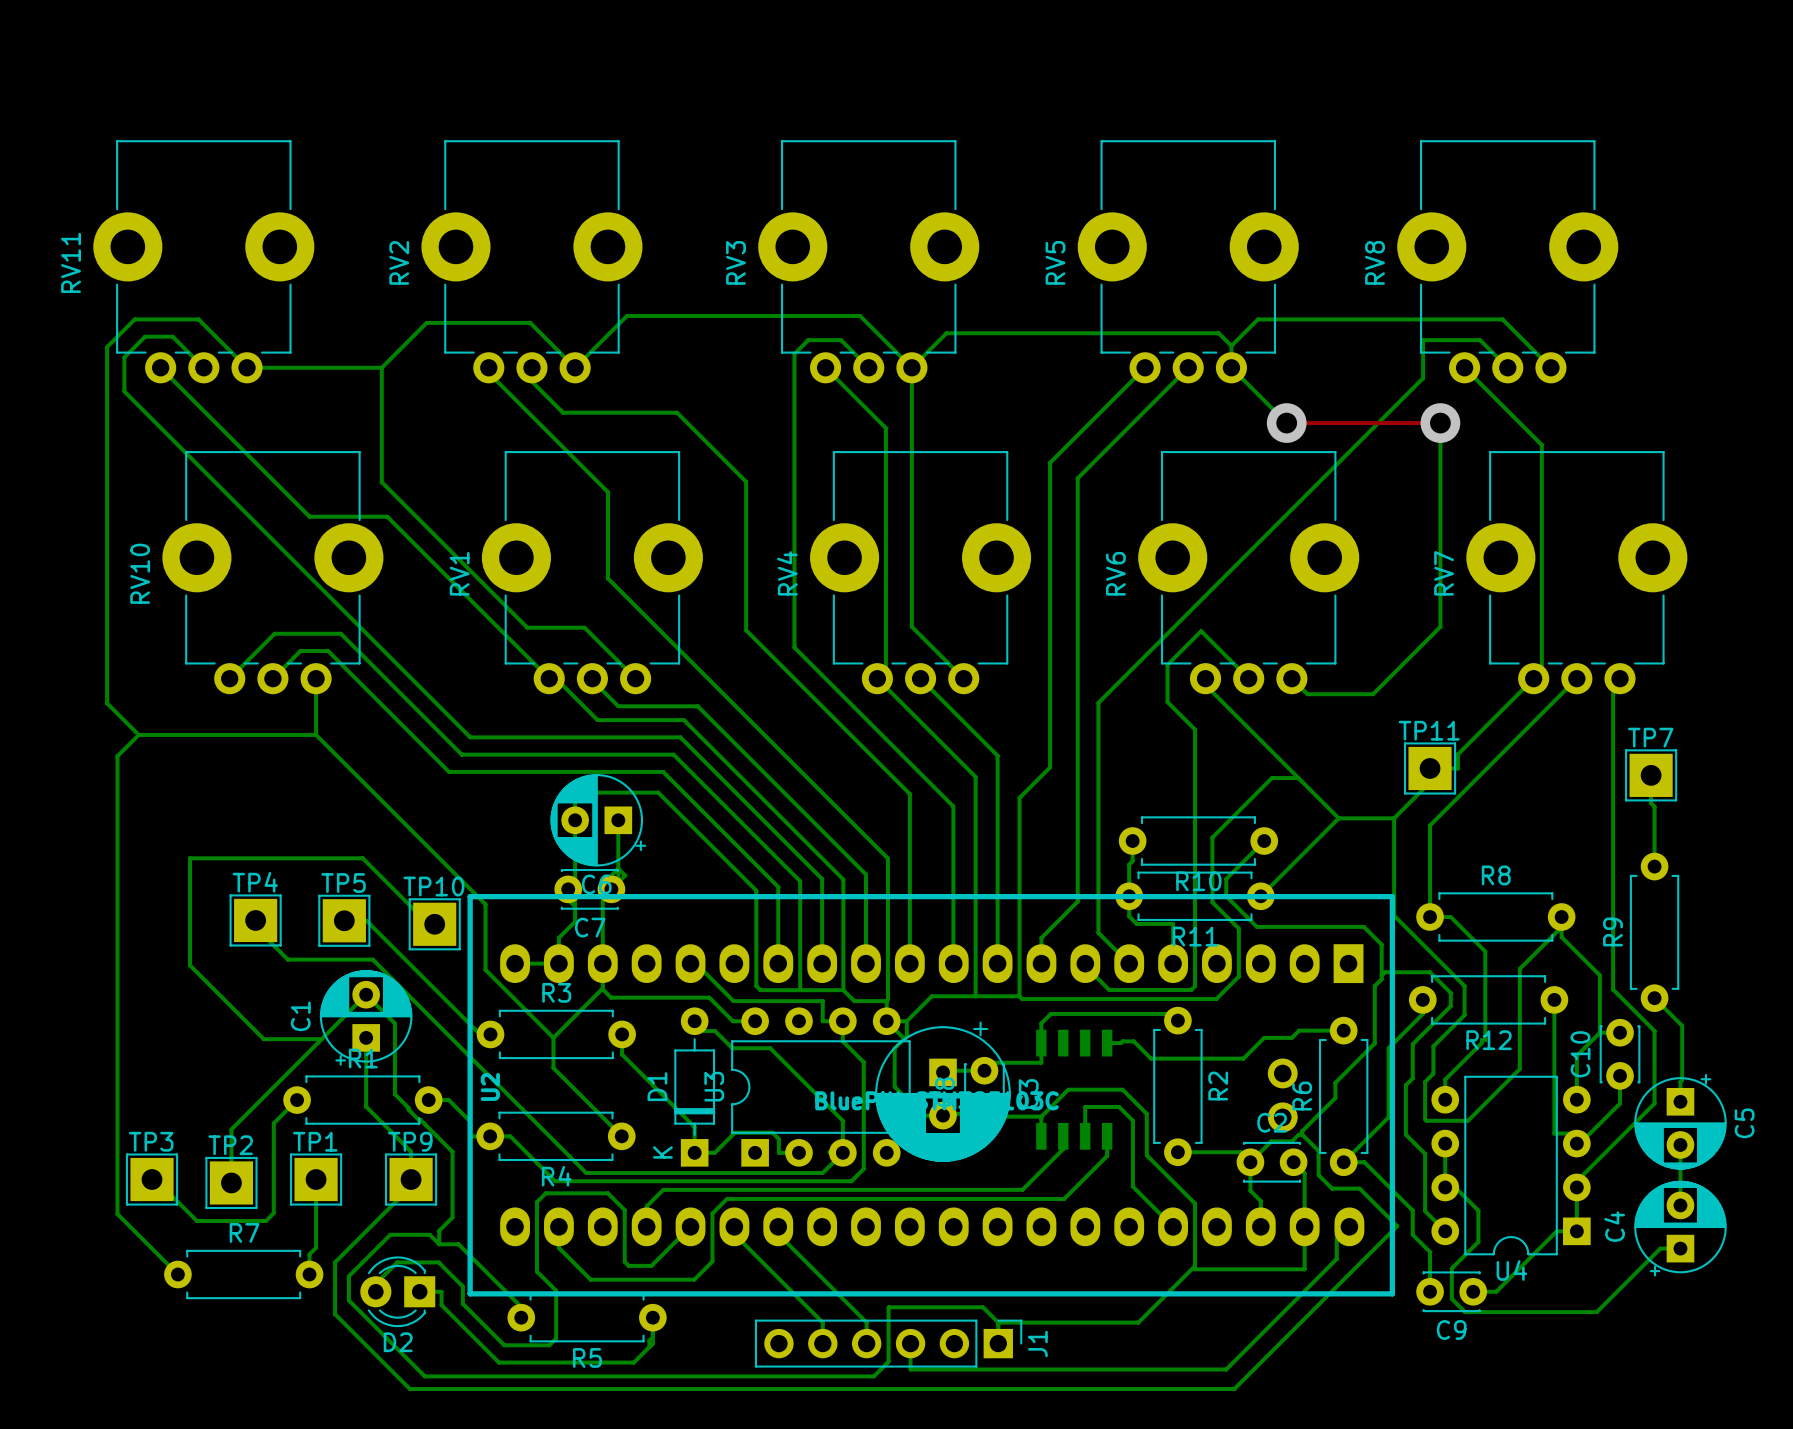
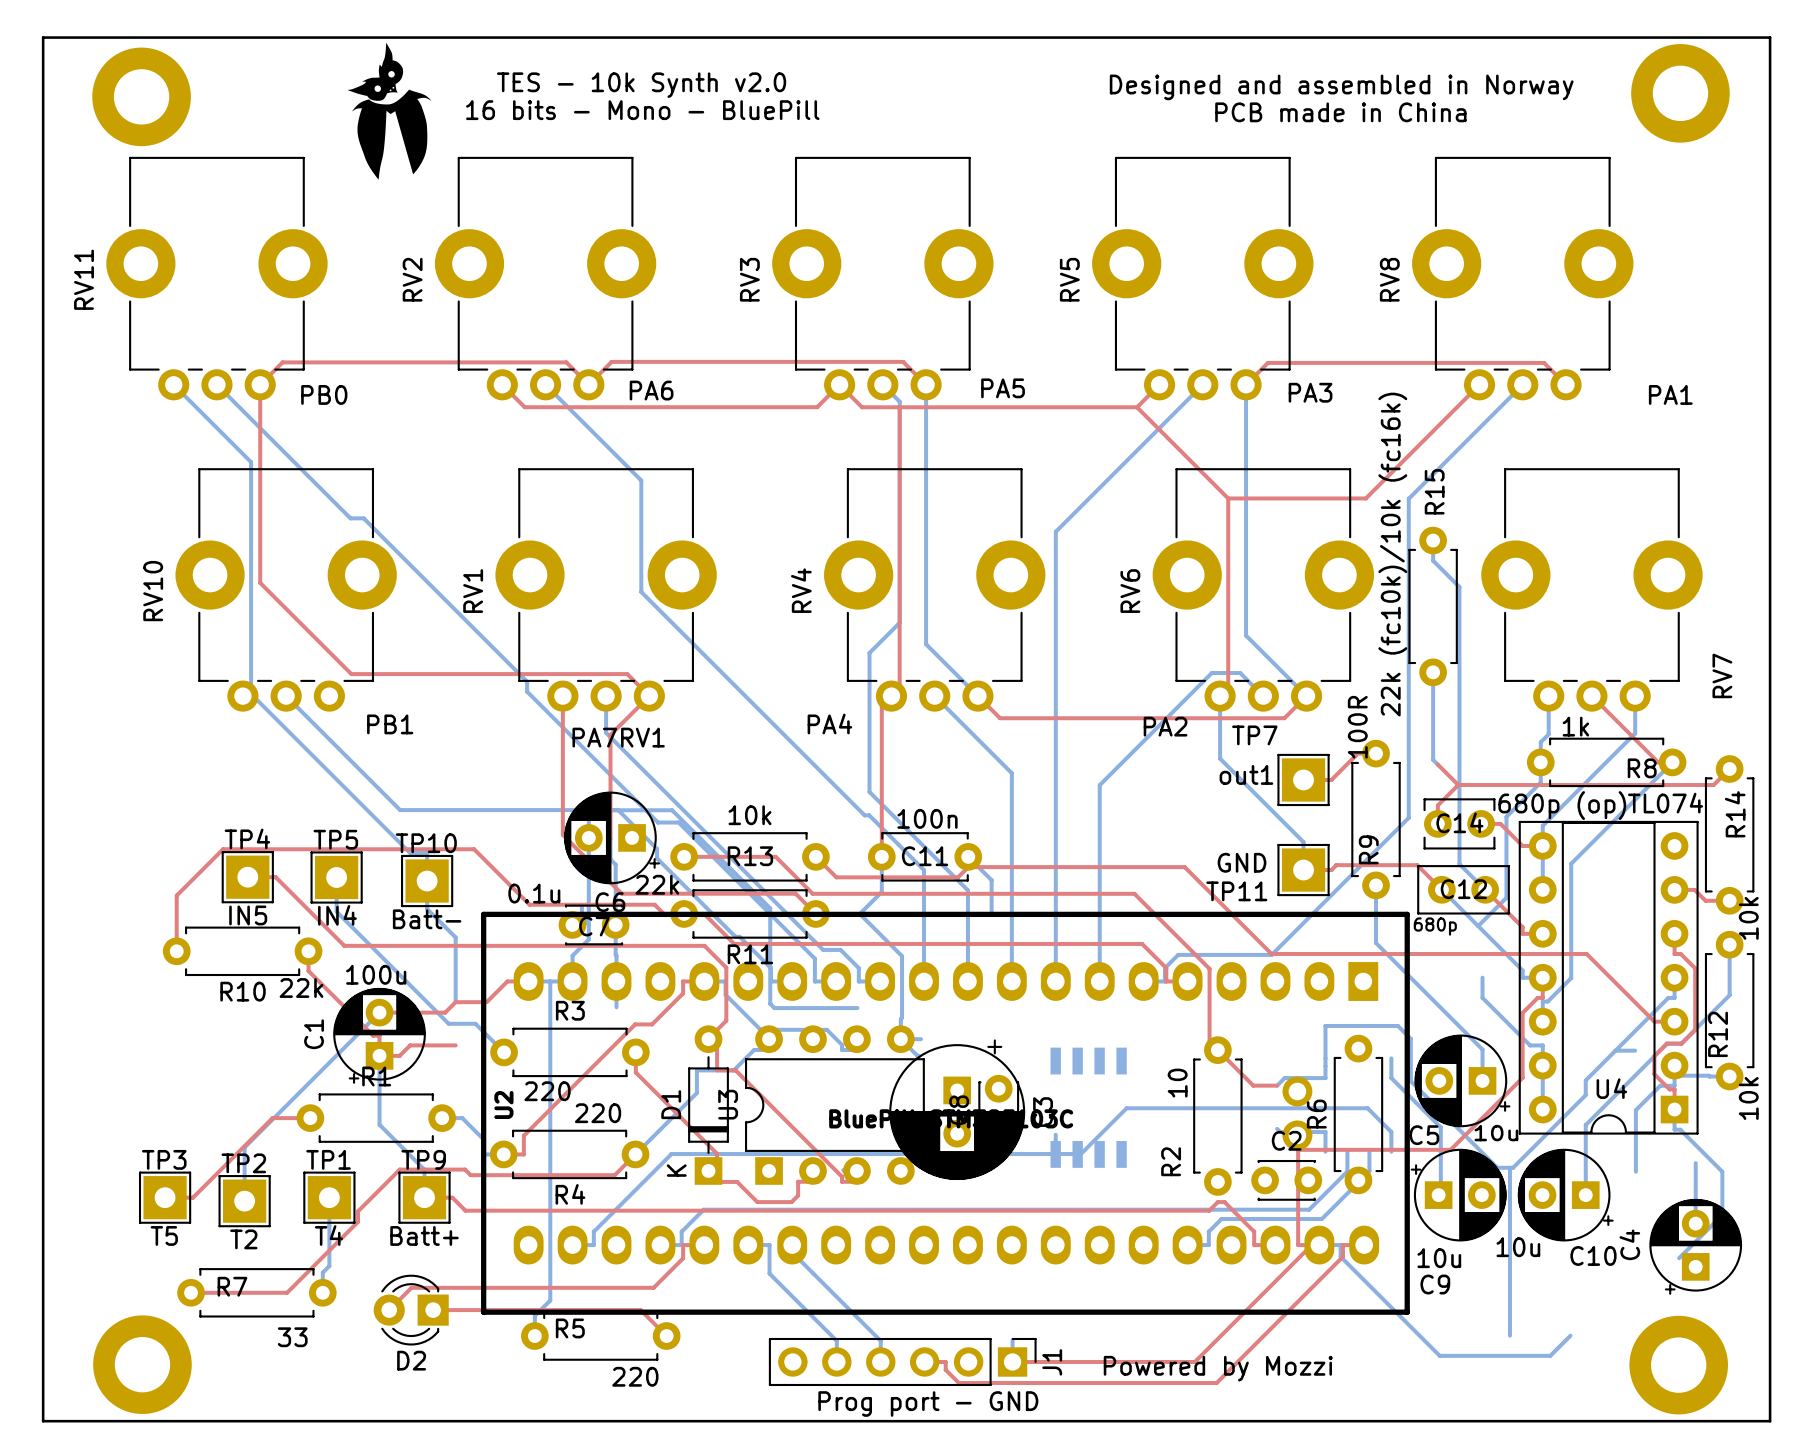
board edge: none -> (43, 37) (1770, 37) (1770, 1421) (43, 1421) (43, 37)
drawing: none -> [347, 42, 432, 180]
text: none -> TES - 10k Synth v2.0 (641, 85)
text: none -> Designed and assembled in Norway (1341, 87)
part: none -> (1680, 93)
part: none -> (141, 96)
text: none -> 16 bits - Mono - BluePill (642, 110)
text: none -> PCB made in China (1340, 112)
bottom track: (1231, 345) (1231, 367) (1286, 423) -> none
bottom track: (1231, 345) (1218, 333) (946, 333) (911, 367) (860, 315) (626, 315) (575, 367) (530, 322) (426, 322) (381, 367) -> none
bottom track: (1231, 345) (1257, 319) (1502, 319) (1550, 367) -> none
bottom track: (203, 367) (172, 336) (145, 336) (124, 357) (124, 391) (470, 737) (680, 737) (822, 879) (822, 963) -> (216, 384) (350, 518) (363, 518) (527, 681) (527, 691) (657, 822) (678, 822) (814, 958) (814, 981) (836, 981)
bottom track: (381, 367) (381, 482) (527, 627) (584, 627) (635, 678) -> none
bottom track: (381, 367) (247, 367) (198, 319) (134, 319) (107, 347) (107, 703) (138, 734) -> none
bottom track: (488, 367) (488, 372) (607, 492) (607, 578) (887, 858) (887, 938) -> (881, 856) (881, 892) (859, 913) (902, 956)
top track: none -> (502, 384) (524, 407) (817, 407) (839, 384) (862, 407) (1137, 407)
bottom track: (531, 367) (531, 381) (563, 412) (677, 412) (746, 481) (746, 630) (909, 794) (909, 852) -> (545, 384) (641, 480) (641, 591) (864, 815) (869, 815) (924, 870)
bottom track: (825, 367) (885, 428) (885, 670) (877, 678) (975, 776) (975, 996) -> none
bottom track: (868, 367) (841, 340) (808, 340) (794, 353) (794, 647) (953, 806) (953, 963) -> (882, 384) (899, 401) (899, 622) (869, 652) (869, 791) (967, 890) (967, 981)
top track: none -> (926, 384) (903, 361) (611, 361) (588, 384) (566, 362) (282, 362) (260, 384) (260, 582) (351, 674) (627, 674) (649, 696) (610, 734) (610, 839)
bottom track: (1145, 367) (1050, 462) (1050, 767) (1019, 797) (1019, 996) -> none
top track: none -> (1159, 384) (1137, 407)
top track: none -> (1246, 384) (1267, 362) (1544, 362) (1566, 384)
bottom track: (1464, 367) (1541, 445) (1541, 670) (1457, 754) (1457, 768) (1430, 768) -> none
top track: none -> (1479, 384) (1365, 498) (1228, 498)
bottom track: (1507, 367) (1480, 340) (1423, 340) (1423, 378) (1098, 702) (1098, 932) (1129, 963) -> (1522, 384) (1408, 498) (1408, 817) (1271, 954) (1178, 954) (1164, 968) (1164, 981) (1143, 981)
RV3 text: none -> PA5 (1003, 388)
RV2 text: none -> PA6 (651, 390)
RV5 text: none -> PA3 (1310, 392)
RV11 text: none -> PB0 (324, 394)
RV7 text: none -> PA1 (1670, 394)
top track: none -> (899, 407) (899, 687) (881, 705) (881, 856)
top track: none -> (1137, 407) (1228, 498)
top track: (1286, 423) (1440, 423) -> none
via: (1286, 423) -> none
bottom track: (1440, 423) (1440, 626) (1373, 694) (1307, 694) (1291, 678) -> (1246, 384) (1246, 635) (1306, 696)
via: (1440, 423) -> none
bottom track: (237, 445) (309, 516) (387, 516) (549, 678) (556, 678) (597, 720) (683, 720) (843, 879) (843, 990) (854, 1001) (886, 1001) -> (251, 462) (251, 691) (246, 696) (242, 696)
bottom track: (1077, 478) (1077, 901) (1041, 937) -> (1092, 495) (1055, 531) (1055, 955)
top track: none -> (1228, 498) (1228, 687) (1220, 696)
bottom track: none -> (1433, 540) (1433, 560) (1459, 587) (1459, 864) (1485, 889)
RV7 name position: RV7 (1444, 573) -> RV7 (1722, 675)
R15: none -> 22k (fc10k)/10k (fc16k) (1433, 606)
bottom track: none -> (1433, 672) (1433, 759) (1437, 764)
bottom track: (1225, 655) (1201, 631) (1167, 664) (1167, 702) (1195, 729) (1195, 986) (1191, 990) (1109, 990) (1085, 966) (1085, 963) -> (1240, 673) (1211, 673) (1099, 785) (1099, 981)
bottom track: none -> (250, 692) (410, 853) (427, 853) (427, 908) (455, 937) (455, 1002)
bottom track: (229, 678) (274, 633) (340, 633) (461, 754) (673, 754) (800, 881) (800, 990) -> none
bottom track: (272, 678) (300, 651) (328, 651) (449, 771) (663, 771) (778, 886) (778, 963) -> (286, 696) (400, 810) (618, 810) (657, 848) (657, 858) (735, 936) (739, 936) (770, 968) (770, 981) (792, 981)
bottom track: (316, 678) (316, 734) -> none
top track: none -> (562, 696) (562, 834) (621, 893) (795, 893) (815, 913) (859, 913)
top track: none -> (977, 696) (1000, 718) (1284, 718) (1306, 696)
bottom track: none -> (1548, 696) (1548, 734) (1540, 742) (1540, 782) (1506, 816) (1506, 897) (1478, 926)
bottom track: (1576, 678) (1430, 825) (1430, 917) (1450, 917) (1485, 951) (1485, 1039) (1481, 1039) (1481, 1042) (1445, 1079) (1445, 1099) -> none
top track: none -> (1591, 696) (1658, 762) (1672, 762)
bottom track: (1620, 678) (1613, 685) (1613, 989) (1654, 1030) (1654, 1103) (1576, 1181) (1576, 1231) (1556, 1231) (1496, 1291) (1473, 1291) -> (1635, 696) (1635, 733) (1542, 825) (1542, 889)
bottom track: (592, 680) (618, 706) (697, 706) (866, 874) (866, 963) -> (606, 697) (606, 732) (823, 949) (840, 949) (858, 968) (858, 981) (880, 981)
bottom track: (1205, 685) (1338, 818) -> (1220, 702) (1220, 758) (1303, 842) (1303, 870)
RV10 text: none -> PB1 (390, 724)
RV4 text: none -> PA4 (829, 724)
RV6 text: none -> PA2 (1165, 726)
R9 value: none -> 100R (1357, 727)
R8 value: none -> 1k (1575, 726)
RV1 text: none -> PA7RV1 (618, 737)
TP11 name position: TP11 (1429, 730) -> TP11 (1236, 891)
bottom track: (138, 734) (316, 734) -> none
bottom track: (138, 734) (117, 756) (117, 1214) (177, 1274) -> none
bottom track: (316, 734) (485, 904) (485, 969) (553, 1037) -> none
top track: none -> (1376, 753) (1355, 753) (1331, 779) (1303, 779)
TP7 name position: TP7 (1650, 737) -> TP7 (1254, 735)
bottom track: none -> (1672, 762) (1571, 863) (1571, 978) (1547, 1001) (1542, 1001) (1542, 1021)
top track: none -> (1437, 764) (1458, 785)
top track: none -> (1729, 768) (1713, 785) (1458, 785)
TP7 value: none -> out1 (1246, 774)
top track: none -> (1458, 785) (1437, 805) (1437, 823)
TP11 position: (1430, 768) -> (1303, 870)
bottom track: (1444, 768) (1394, 818) -> none
bottom track: (1651, 775) (1651, 803) (1654, 806) (1654, 866) -> none
TP7 position: (1651, 775) -> (1303, 779)
bottom track: (1298, 778) (1271, 778) (1212, 837) (1212, 902) (1238, 928) (1238, 976) (1216, 999) (1022, 999) (1019, 996) -> none
U4 value: none -> TL074 (1665, 803)
C14: none -> 680p (op) (1459, 823)
top track: none -> (1481, 823) (1500, 823) (1522, 845) (1542, 845)
R14: none -> 10k (1729, 834)
bottom track: (1338, 818) (1260, 896) -> none
bottom track: (1338, 818) (1394, 818) -> none
bottom track: (1394, 818) (1394, 915) (1464, 986) (1464, 1015) (1433, 1046) (1433, 1073) (1425, 1081) (1426, 1120) (1468, 1120) (1519, 1068) (1519, 968) (1561, 927) -> none
bottom track: (618, 820) (618, 882) -> none
top track: none -> (684, 856) (775, 856) (812, 893) (1134, 893) (1209, 968) (1209, 1041) (1253, 1085) (1277, 1085)
R13: none -> 10k (750, 856)
top track: none -> (815, 856) (836, 877) (958, 877) (968, 867)
C11: none -> 100n (925, 856)
bottom track: none -> (968, 856) (991, 880) (991, 913)
bottom track: (1132, 841) (1132, 861) (1129, 864) (1129, 916) (1136, 923) (1173, 923) (1173, 963) -> none
R10 position: (1198, 841) -> (242, 951)
bottom track: (1264, 841) (1226, 879) (1226, 896) (1256, 926) (1363, 926) (1381, 944) (1381, 979) (1374, 986) (1374, 1043) (1335, 1082) (1335, 1098) (1302, 1131) (1302, 1134) -> none
TP11 value: none -> GND (1242, 862)
top track: none -> (968, 867) (1184, 867) (1271, 953) (1586, 953) (1654, 1021) (1674, 1021)
top track: none -> (1303, 870) (1331, 870) (1336, 865) (1417, 865) (1441, 889)
top track: none -> (247, 877) (275, 877) (344, 945) (704, 945) (726, 967) (726, 1020) (717, 1029) (717, 1070) (735, 1070) (842, 1176) (842, 1181) (862, 1181)
R11 value: none -> 22k (657, 884)
bottom track: none -> (1376, 885) (1376, 943) (1482, 1049) (1482, 1080)
bottom track: none -> (1441, 889) (1478, 926)
C12: none -> 680p (1463, 889)
top track: none -> (1485, 889) (1522, 927) (1522, 933) (1542, 933)
top track: none -> (1674, 889) (1694, 889) (1705, 900) (1729, 900)
C7 value: none -> 0.1u (534, 893)
R8 name position: R8 (1496, 875) -> R8 (1642, 768)
C7 position: (589, 889) -> (594, 924)
bottom track: (611, 889) (625, 875) (618, 868) (602, 884) (602, 937) -> (610, 839) (610, 859) (615, 864) (616, 955)
R11 position: (1194, 896) -> (750, 913)
TP4 value: none -> IN5 (248, 915)
TP5 value: none -> IN4 (337, 915)
TP10 value: none -> Batt- (427, 919)
bottom track: none -> (1478, 926) (1522, 970) (1522, 977) (1542, 977)
top track: none -> (1674, 933) (1674, 953) (1680, 953) (1695, 968) (1695, 1030) (1681, 1043) (1666, 1043) (1654, 1056) (1654, 1074) (1669, 1089) (1674, 1089) (1674, 1109)
R8 position: (1495, 917) -> (1606, 762)
bottom track: (1561, 917) (1561, 937) (1599, 975) (1599, 1032) (1576, 1055) (1576, 1099) -> none
bottom track: (255, 920) (255, 927) (287, 959) (372, 959) (586, 1172) (822, 1172) (842, 1152) (842, 1120) (770, 1048) (732, 1048) (715, 1030) (704, 1030) (694, 1021) -> none
TP4 position: (255, 920) -> (247, 877)
bottom track: (344, 920) (366, 920) (480, 1034) (490, 1034) -> (336, 877) (336, 911) (448, 1023) (475, 1023) (504, 1052)
TP5 position: (344, 920) -> (336, 877)
bottom track: (434, 924) (428, 924) (362, 858) (190, 858) (190, 965) (263, 1039) (321, 1039) -> none
TP10 position: (434, 924) -> (427, 881)
bottom track: none -> (1729, 944) (1729, 995) (1681, 1043) (1667, 1043) (1585, 1125) (1585, 1195)
C7 name position: C7 (590, 927) -> C7 (594, 926)
R9 name position: R9 (1612, 931) -> R9 (1368, 849)
R9 position: (1654, 932) -> (1376, 819)
top track: none -> (176, 951) (176, 895) (223, 849) (474, 849) (529, 904) (654, 904) (663, 913) (704, 913) (734, 943) (1142, 943) (1166, 968) (1166, 981) (1187, 981)
top track: none -> (308, 951) (308, 970) (373, 1035) (379, 1035) (379, 1055) (399, 1055) (410, 1045) (455, 1045)
C1 value: none -> 100u (376, 974)
bottom track: none -> (1482, 977) (1482, 997) (1530, 1045) (1542, 1045) (1542, 1109)
top track: none -> (1542, 977) (1542, 997) (1537, 997) (1522, 1013) (1522, 1077) (1450, 1149) (1298, 1149) (1298, 1245) (1319, 1245)
bottom track: none -> (1674, 977) (1674, 997) (1668, 997) (1585, 1080) (1585, 1095) (1513, 1167) (1497, 1167) (1410, 1081) (1410, 1038) (1397, 1025) (1325, 1025) (1325, 1078) (1284, 1078) (1277, 1085)
top track: none -> (528, 981) (507, 981) (486, 1002) (455, 1002) (445, 1012) (379, 1012)
top track: none -> (704, 981) (683, 981) (683, 993) (652, 1024) (635, 1024) (523, 1135) (523, 1154) (503, 1154)
bottom track: (696, 963) (733, 1001) (822, 1001) (822, 1021) (842, 1021) (842, 1041) (863, 1062) (863, 1168) (851, 1181) (555, 1181) (510, 1136) (490, 1136) -> (709, 981) (725, 981) (725, 994) (760, 1029) (826, 1029) (842, 1044) (842, 1049) (862, 1049)
R10 value: none -> 22k (301, 988)
bottom track: (1381, 975) (1385, 972) (1430, 972) (1450, 992) (1450, 1006) (1412, 1044) (1412, 1078) (1405, 1085) (1405, 1134) (1425, 1153) (1425, 1211) (1445, 1231) -> none
bottom track: (366, 994) (394, 1023) (394, 1094) (452, 1151) (452, 1217) (439, 1230) (439, 1244) -> none
bottom track: (1019, 996) (931, 996) (906, 1021) (906, 1036) (894, 1048) (894, 1086) (923, 1115) (984, 1113) (987, 1116) (1041, 1116) (1068, 1089) (1122, 1089) (1146, 1113) (1146, 1155) (1195, 1203) (1195, 1269) (1304, 1269) (1304, 1173) (1293, 1162) -> none
bottom track: (1654, 998) (1682, 1025) (1680, 1101) -> none
bottom track: (1422, 999) (1422, 1014) (1388, 1048) (1388, 1117) (1343, 1162) (1364, 1162) (1412, 1210) (1412, 1234) (1430, 1252) (1430, 1291) -> none
R12 rotation: 0° (1488, 999) -> 90° clockwise (1729, 1010)
R12 position: (1488, 999) -> (1729, 1010)
bottom track: (1554, 999) (1554, 1133) (1576, 1133) (1576, 1143) (1579, 1143) (1620, 1103) (1620, 1075) -> none
C10 footprint: [1599, 1018, 1641, 1090] -> [1517, 1148, 1614, 1242]
bottom track: (1177, 1020) (1171, 1013) (1050, 1013) (1041, 1023) (1041, 1062) (992, 1062) (984, 1070) (944, 1070) (943, 1072) -> none
bottom track: (755, 1021) (732, 1021) (709, 997) (611, 997) (601, 989) (553, 1037) -> none
bottom track: (1343, 1030) (1299, 1030) (1291, 1037) (1264, 1037) (1243, 1058) (1151, 1058) (1133, 1041) (1107, 1043) -> none
bottom track: (622, 1034) (622, 1054) (694, 1127) (694, 1152) (714, 1152) (734, 1132) (772, 1132) (778, 1139) (778, 1152) (798, 1152) -> none
top track: none -> (635, 1052) (635, 1072) (717, 1153) (717, 1181) (737, 1181) (757, 1202) (791, 1202) (798, 1195) (798, 1181) (818, 1181)
bottom track: (553, 1037) (553, 1068) (621, 1136) -> (774, 1049) (754, 1049) (733, 1070) (696, 1070) (696, 1093) (635, 1154)
bottom track: none -> (1391, 1058) (1391, 1078) (1440, 1127) (1440, 1186)
bottom track: none -> (1674, 1065) (1674, 1085) (1660, 1085) (1635, 1110) (1635, 1171)
C10 name position: C10 (1580, 1054) -> C10 (1593, 1255)
bottom track: none -> (1674, 1075) (1729, 1076)
R2 value: none -> 10 (1177, 1083)
R3 value: none -> 220 (547, 1091)
U4 footprint: [1431, 1075, 1591, 1256] -> [1518, 820, 1699, 1135]
R12 value: none -> 10k (1748, 1098)
R2 position: (1177, 1086) -> (1217, 1116)
R2 name position: R2 (1218, 1086) -> R2 (1171, 1161)
bottom track: none -> (1674, 1109) (1674, 1129) (1680, 1129) (1722, 1171) (1722, 1214) (1679, 1258)
R4 value: none -> 220 (598, 1113)
bottom track: (297, 1100) (273, 1123) (273, 1213) (266, 1220) (196, 1220) (169, 1193) (169, 1179) (152, 1179) -> none
top track: none -> (310, 1118) (272, 1118) (193, 1197) (165, 1197)
bottom track: none -> (1277, 1128) (1280, 1132) (1325, 1132) (1325, 1151)
C5 value: none -> 10u (1496, 1133)
C5 rotation: 0° (1680, 1121) -> 90° clockwise (1462, 1080)
C5 position: (1680, 1121) -> (1462, 1080)
C5 name position: C5 (1744, 1123) -> C5 (1424, 1135)
bottom track: (1302, 1134) (1298, 1134) (1292, 1141) (1271, 1141) (1250, 1162) -> none
bottom track: (1302, 1134) (1318, 1151) (1318, 1175) (1332, 1188) (1359, 1188) (1397, 1226) (1234, 1389) (409, 1389) (335, 1314) (335, 1262) (411, 1186) (411, 1179) -> none
top track: none -> (635, 1154) (614, 1175) (470, 1175) (465, 1169) (399, 1169) (358, 1211) (358, 1221) (287, 1292) (191, 1292)
bottom track: (1063, 1136) (1063, 1149) (1022, 1189) (663, 1189) (646, 1206) (646, 1226) -> (1347, 1151) (1347, 1171) (1309, 1209) (703, 1209) (681, 1231) (681, 1245) (660, 1245)
bottom track: (1085, 1136) (1085, 1106) (1119, 1106) (1132, 1120) (1132, 1186) (1173, 1226) -> (1369, 1151) (1369, 1171) (1321, 1219) (1221, 1219) (1208, 1231) (1208, 1245) (1187, 1245)
bottom track: (1107, 1136) (1107, 1156) (1064, 1198) (727, 1198) (712, 1213) (712, 1261) (694, 1279) (590, 1279) (558, 1247) (558, 1226) -> (1391, 1151) (1391, 1132) (1367, 1108) (1126, 1108) (1080, 1154) (671, 1154) (593, 1231) (593, 1245) (572, 1245)
bottom track: (1445, 1143) (1445, 1189) (1457, 1189) (1478, 1210) (1478, 1241) (1451, 1268) (1451, 1298) (1465, 1312) (1596, 1312) (1660, 1248) (1680, 1248) -> none
bottom track: none -> (1509, 1167) (1509, 1335)
bottom track: (1177, 1152) (1240, 1152) (1250, 1162) -> none
bottom track: (1250, 1162) (1250, 1190) (1260, 1201) (1260, 1226) -> none
top track: none -> (424, 1197) (452, 1197) (465, 1210) (1209, 1210) (1217, 1202) (1224, 1202) (1254, 1231) (1254, 1245) (1275, 1245)
TP3 value: none -> T5 (164, 1235)
TP1 value: none -> T4 (328, 1235)
TP9 value: none -> Batt+ (424, 1235)
TP2 value: none -> T2 (243, 1239)
bottom track: (690, 1226) (651, 1265) (628, 1265) (624, 1261) (624, 1210) (607, 1193) (545, 1193) (536, 1202) (536, 1271) (556, 1290) (556, 1338) (549, 1345) (504, 1345) (462, 1303) (462, 1286) (438, 1262) (397, 1262) (375, 1283) (375, 1291) -> none
top track: none -> (704, 1245) (683, 1245) (683, 1258) (653, 1287) (411, 1287) (389, 1310)
bottom track: (734, 1226) (734, 1234) (755, 1255) -> (748, 1245) (769, 1245) (769, 1273)
top track: none -> (1311, 1245) (1194, 1361) (1012, 1361)
bottom track: none -> (1319, 1245) (1340, 1245) (1340, 1256) (1439, 1355) (1550, 1355) (1570, 1335)
bottom track: (1349, 1226) (1336, 1226) (1336, 1258) (1226, 1369) (910, 1369) (910, 1343) -> none
top track: none -> (1364, 1245) (1342, 1245) (1342, 1256) (1216, 1383) (958, 1383) (945, 1369) (945, 1361) (924, 1361)
C10 value: none -> 10u (1518, 1247)
R7 name position: R7 (244, 1232) -> R7 (232, 1286)
C9 value: none -> 10u (1439, 1258)
bottom track: (439, 1244) (458, 1244) (521, 1306) -> (550, 981) (550, 1300) (534, 1315) (534, 1325)
bottom track: (439, 1244) (429, 1234) (390, 1234) (348, 1276) (348, 1300) (424, 1376) (873, 1376) (888, 1361) (888, 1307) (983, 1307) (998, 1322) (1138, 1322) (1195, 1266) -> none
C9 footprint: [1416, 1271, 1488, 1313] -> [1410, 1148, 1507, 1242]
bottom track: (419, 1291) (441, 1291) (441, 1305) (499, 1362) (633, 1362) (652, 1343) (652, 1317) -> none
top track: none -> (433, 1310) (640, 1310) (666, 1336)
R7 value: none -> 33 (292, 1337)
C9 name position: C9 (1451, 1329) -> C9 (1435, 1284)
bottom track: (652, 1337) (649, 1340) (649, 1347) -> none
part: none -> (142, 1364)
part: none -> (1678, 1365)
text: none -> Powered by Mozzi (1218, 1368)
R5 name position: R5 (587, 1357) -> R5 (570, 1328)
R5 value: none -> 220 (635, 1376)
J1 value: none -> Prog port - GND (928, 1404)

